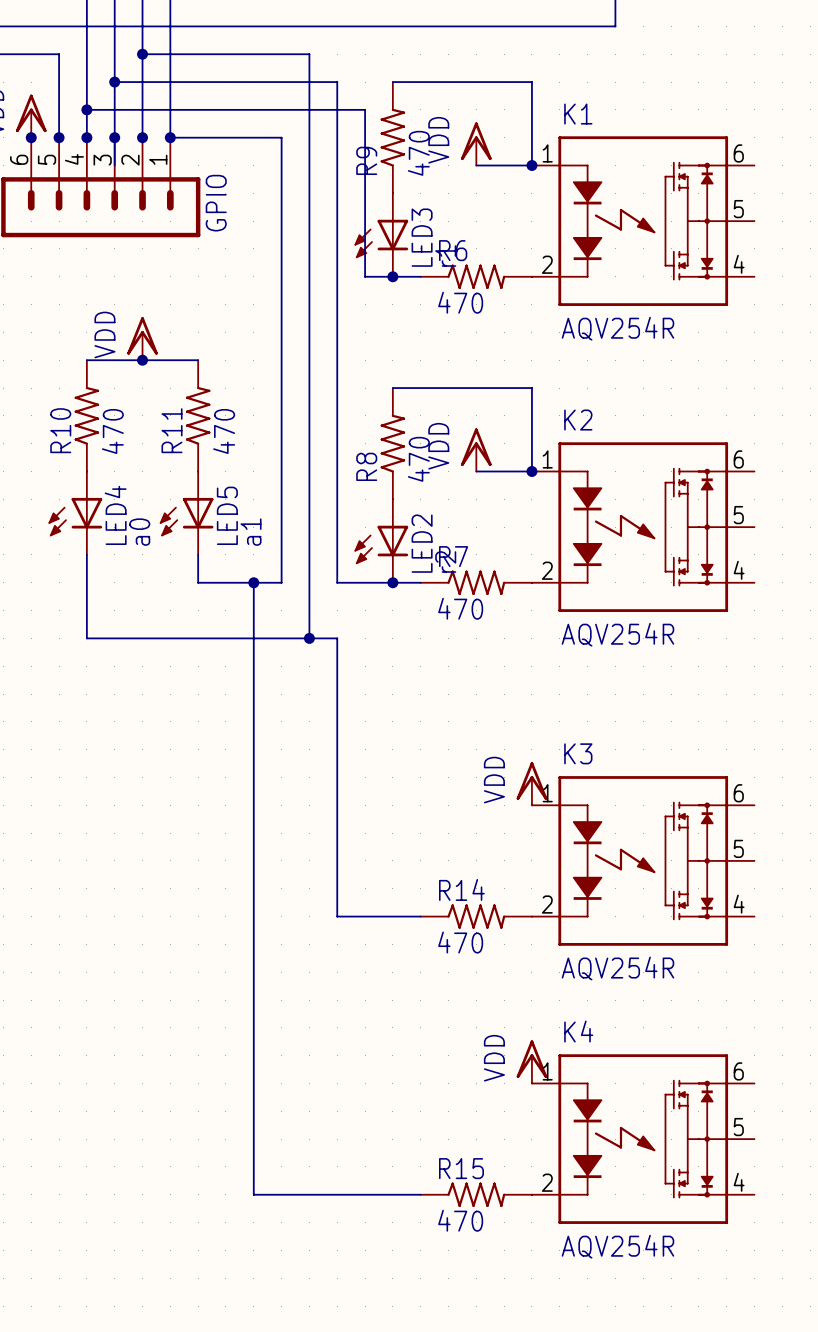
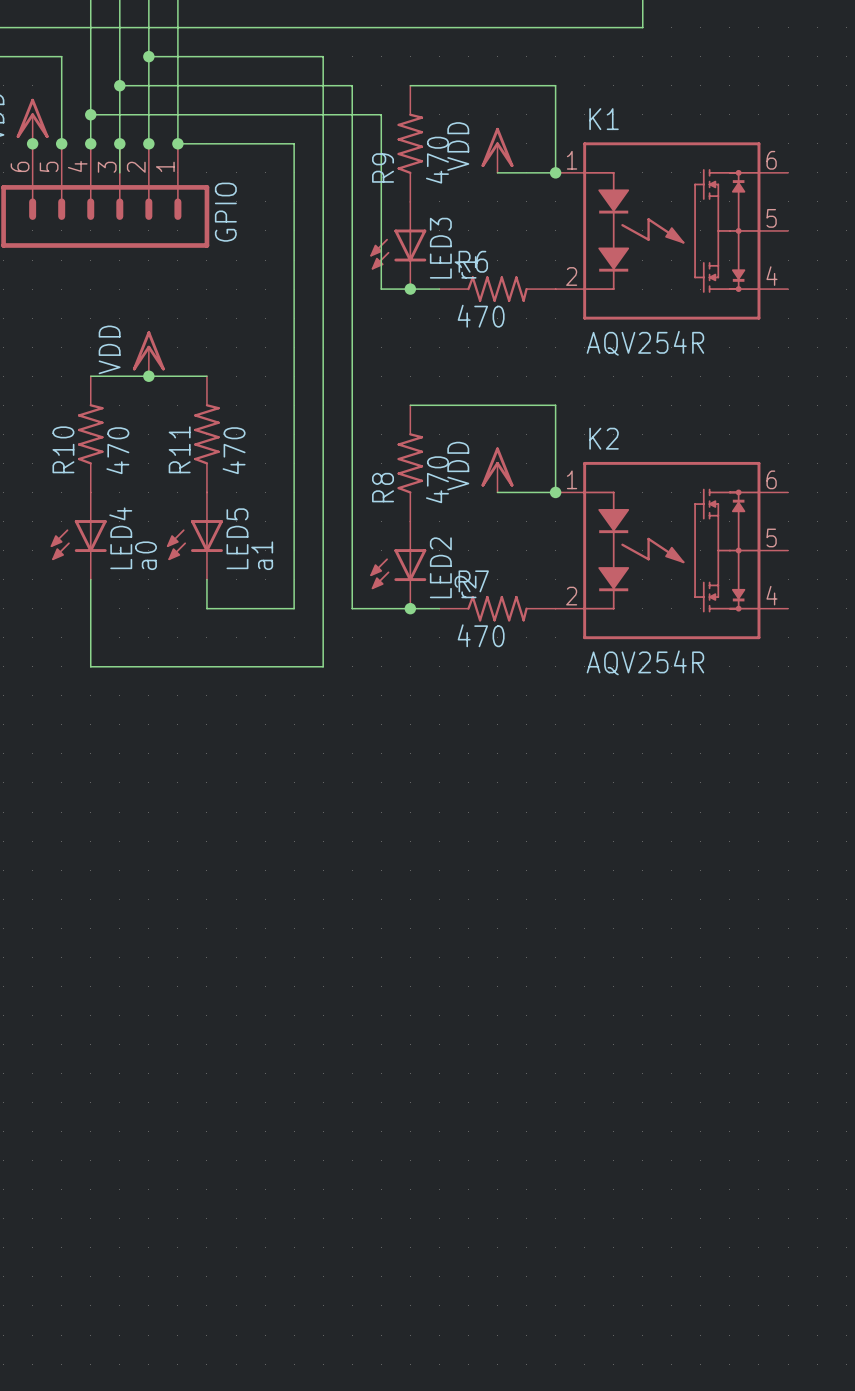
wire: (253, 582) (253, 1194) (420, 1194) -> none
junction: (253, 582) -> none
wire: (309, 638) (337, 638) (337, 916) (420, 916) -> none
junction: (309, 638) -> none
power symbol: VDD (531, 783) -> none
K3: AQV254R (643, 860) -> none
R14: 470 (476, 916) -> none
power symbol: VDD (531, 1061) -> none
K4: AQV254R (643, 1139) -> none
R15: 470 (476, 1194) -> none

